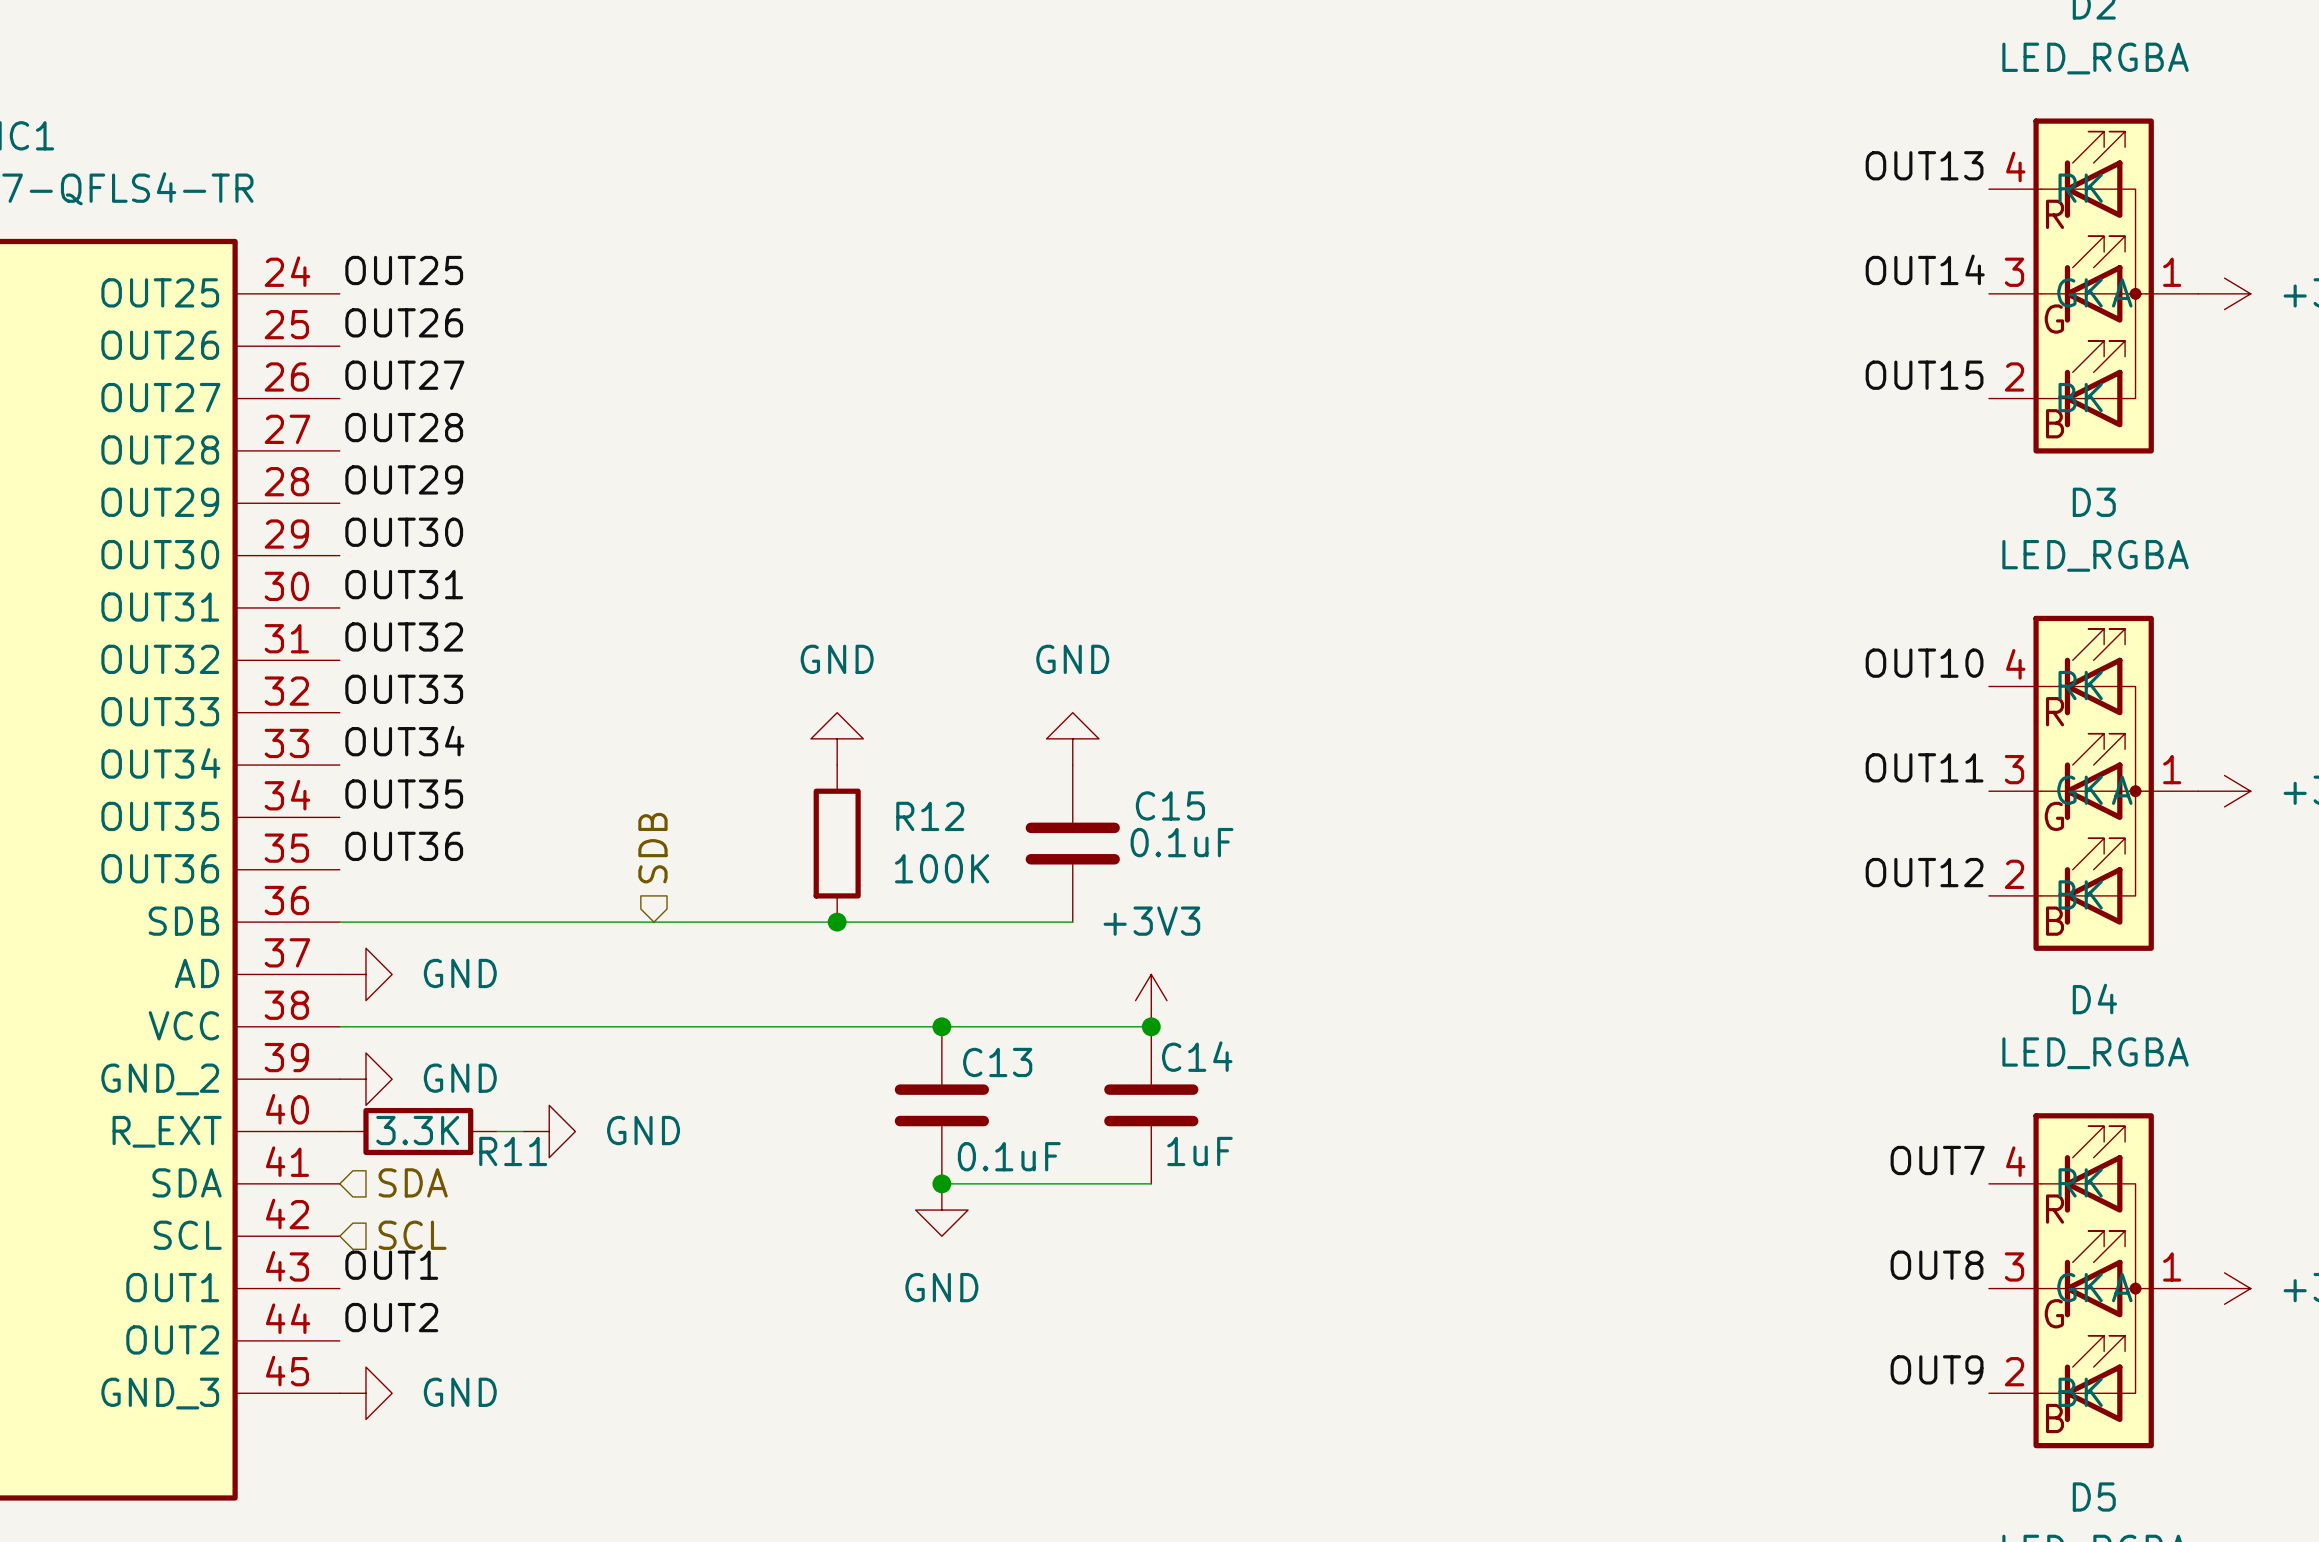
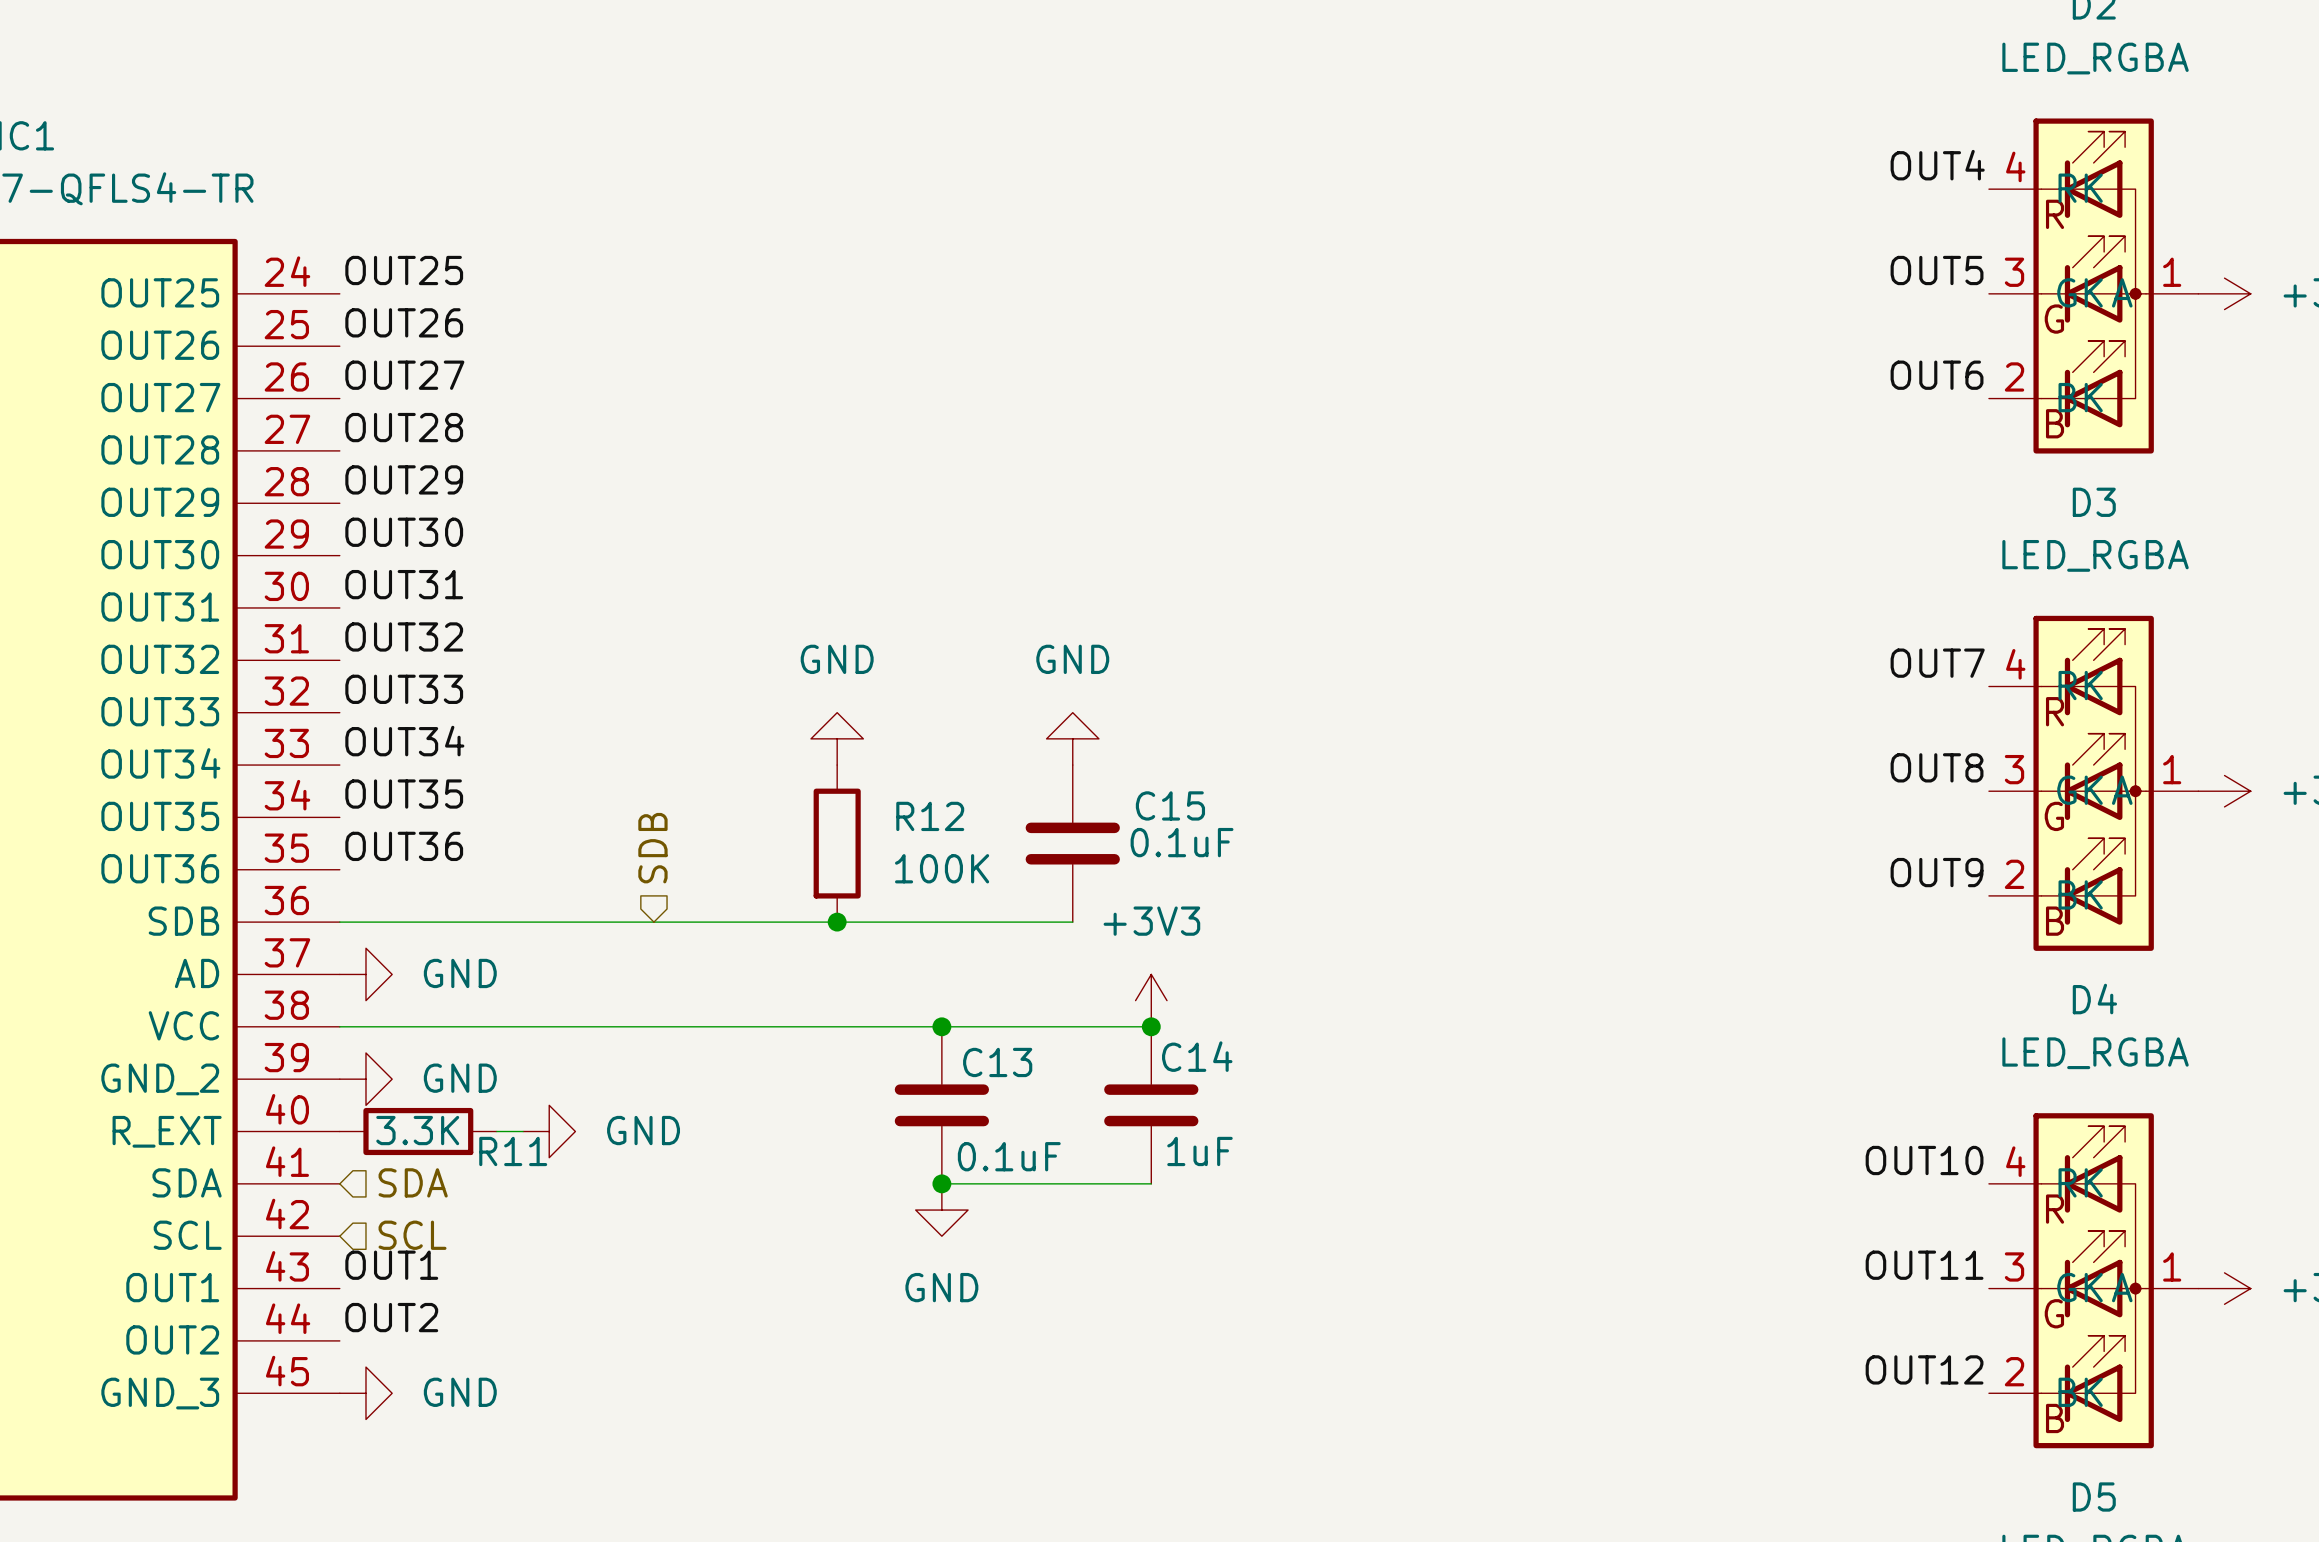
label: OUT13 (1924, 165) -> OUT4 (1937, 165)
label: OUT14 (1925, 269) -> OUT5 (1937, 270)
label: OUT15 (1924, 375) -> OUT6 (1937, 375)
label: OUT10 (1924, 663) -> OUT7 (1937, 663)
label: OUT11 (1924, 767) -> OUT8 (1937, 767)
label: OUT12 (1924, 872) -> OUT9 (1937, 872)
label: OUT7 (1937, 1160) -> OUT10 (1924, 1160)
label: OUT8 (1937, 1265) -> OUT11 (1924, 1265)
label: OUT9 (1937, 1369) -> OUT12 (1924, 1369)

